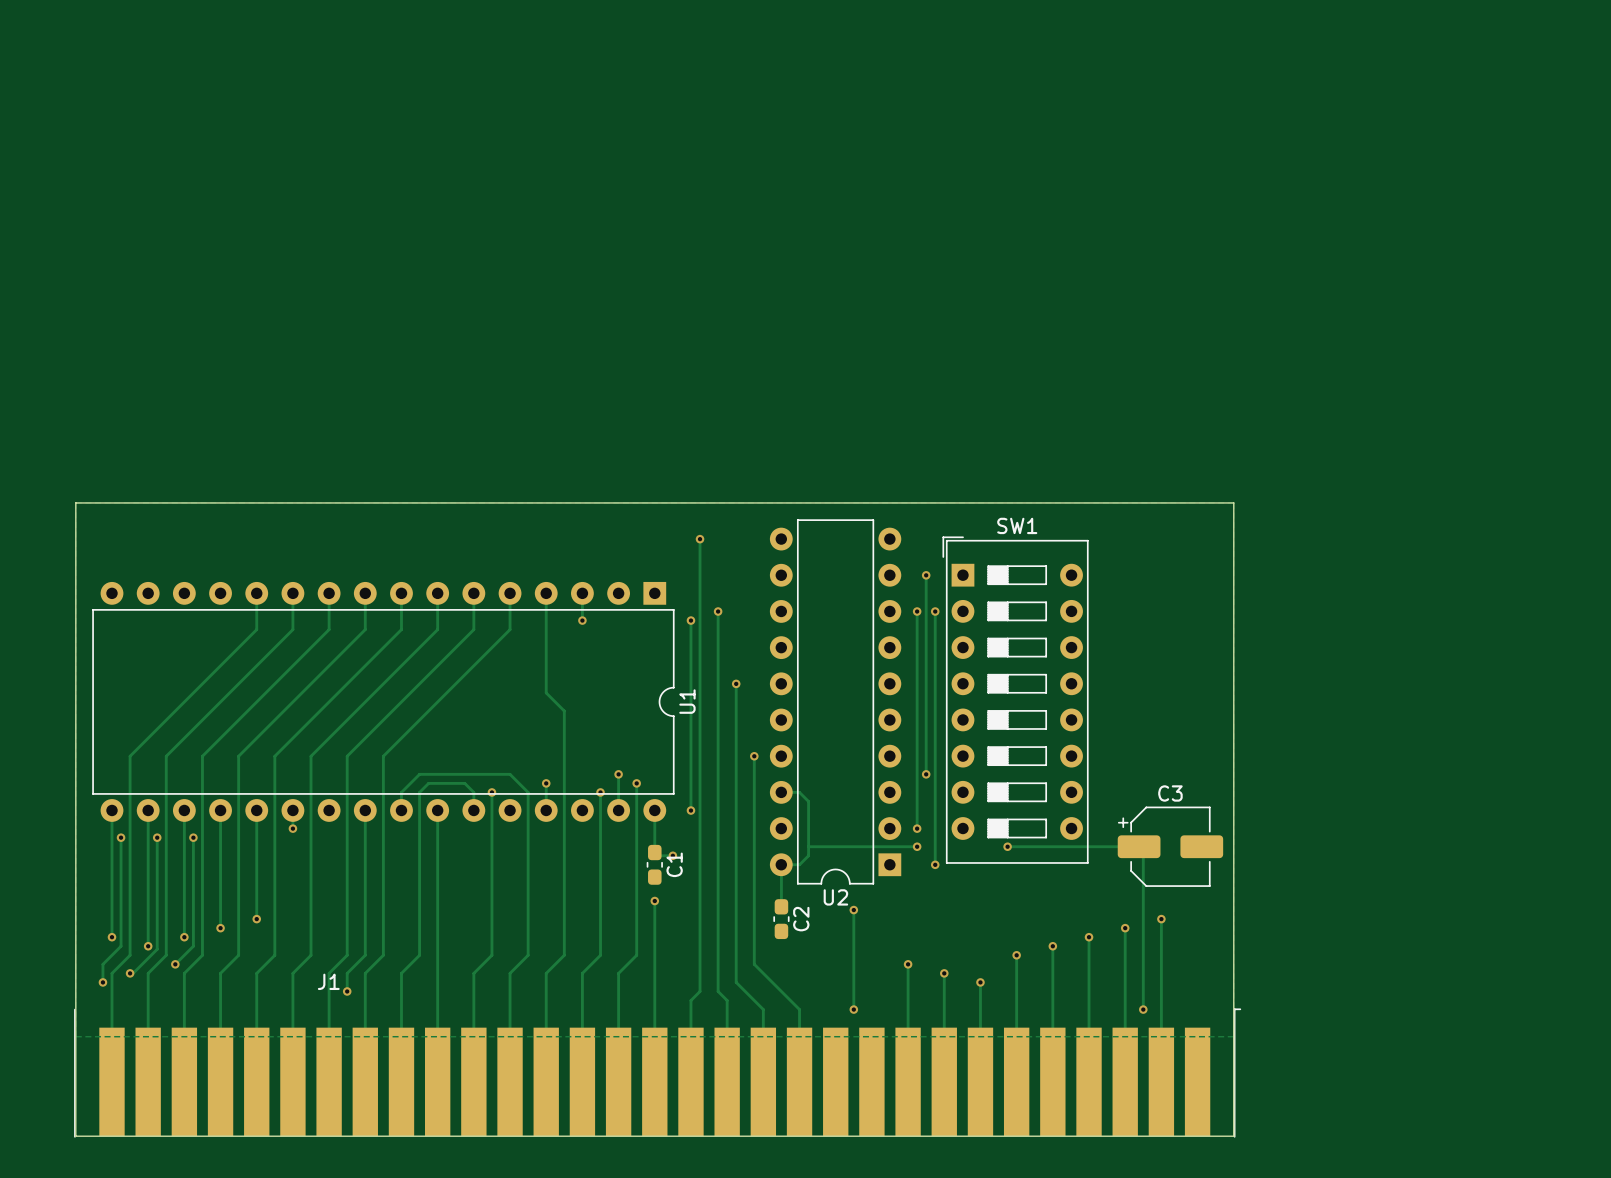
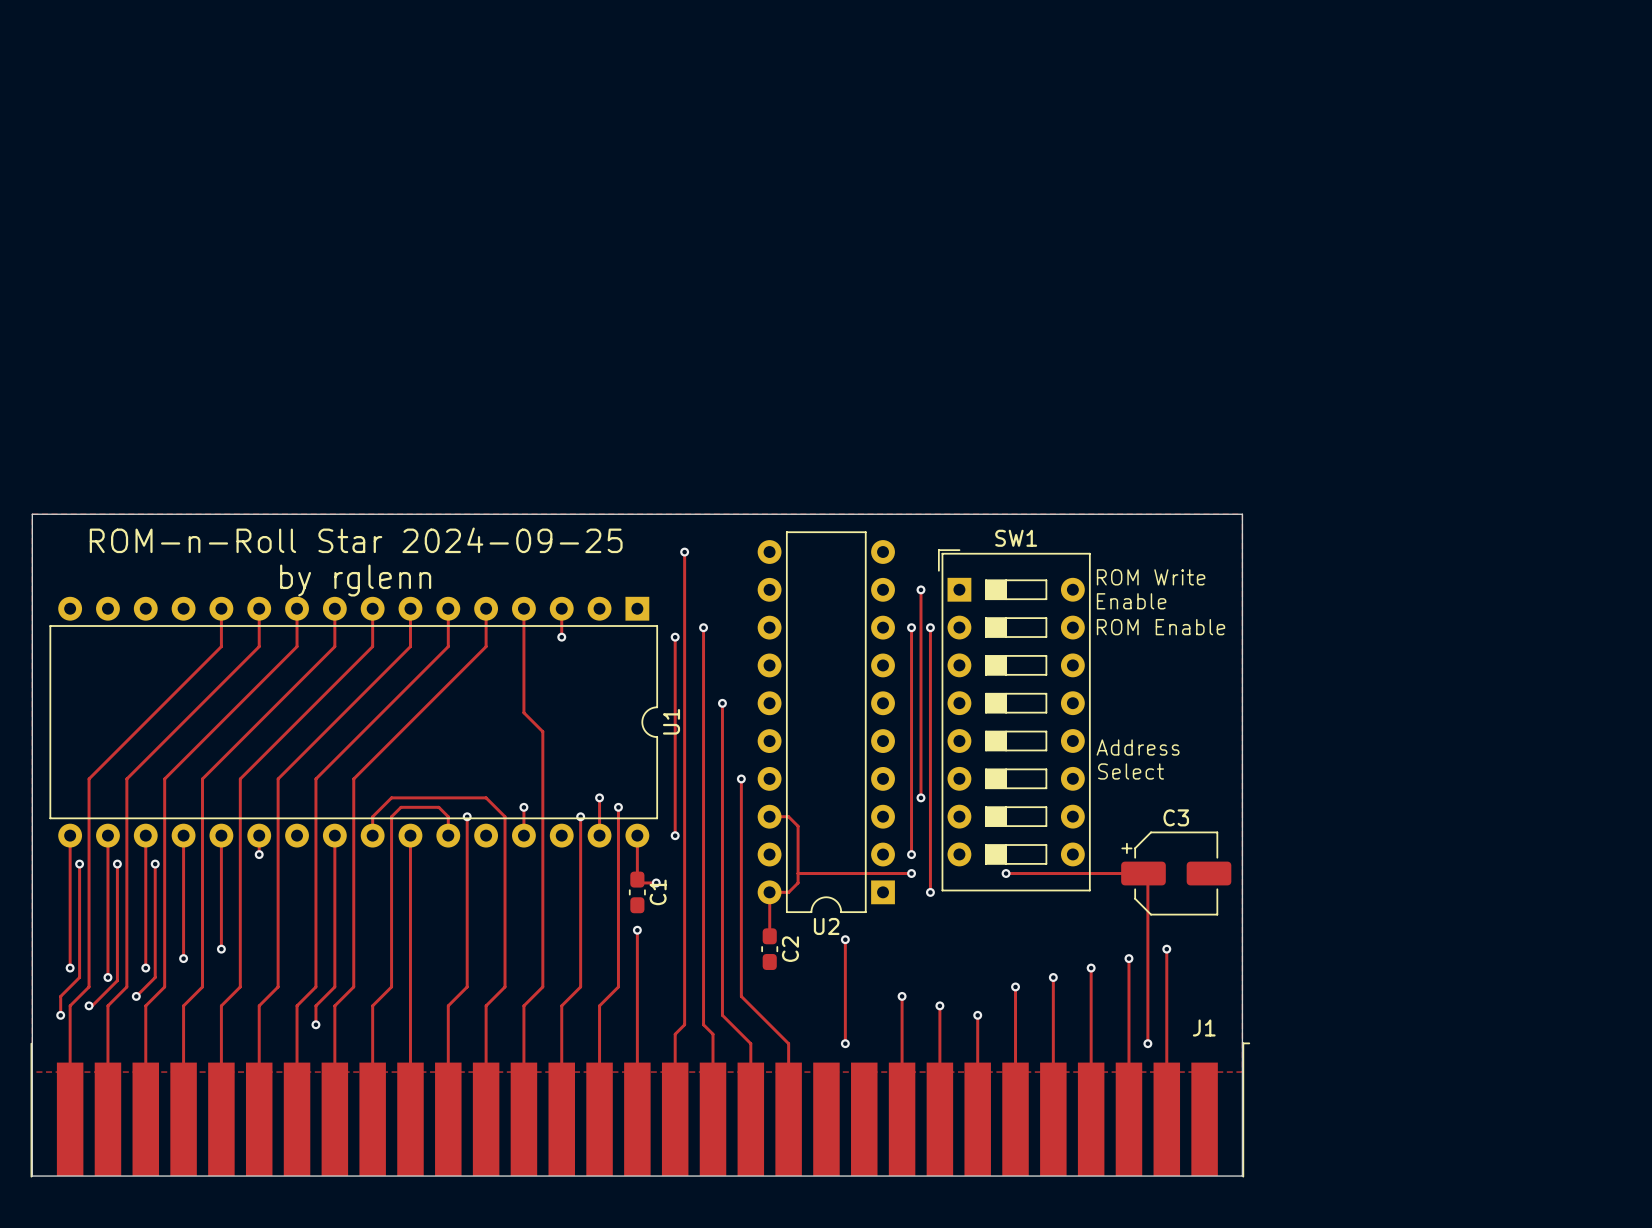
text: none -> ROM-n-Roll Star 2024-09-25 (356, 540)
text: none -> ROM Write (1151, 577)
text: none -> by rglenn (355, 580)
text: none -> Enable (1131, 601)
text: none -> ROM Enable (1161, 627)
text: none -> Address (1138, 747)
text: none -> Select (1131, 771)
J1 name position: J1 (328, 981) -> J1 (1204, 1027)

